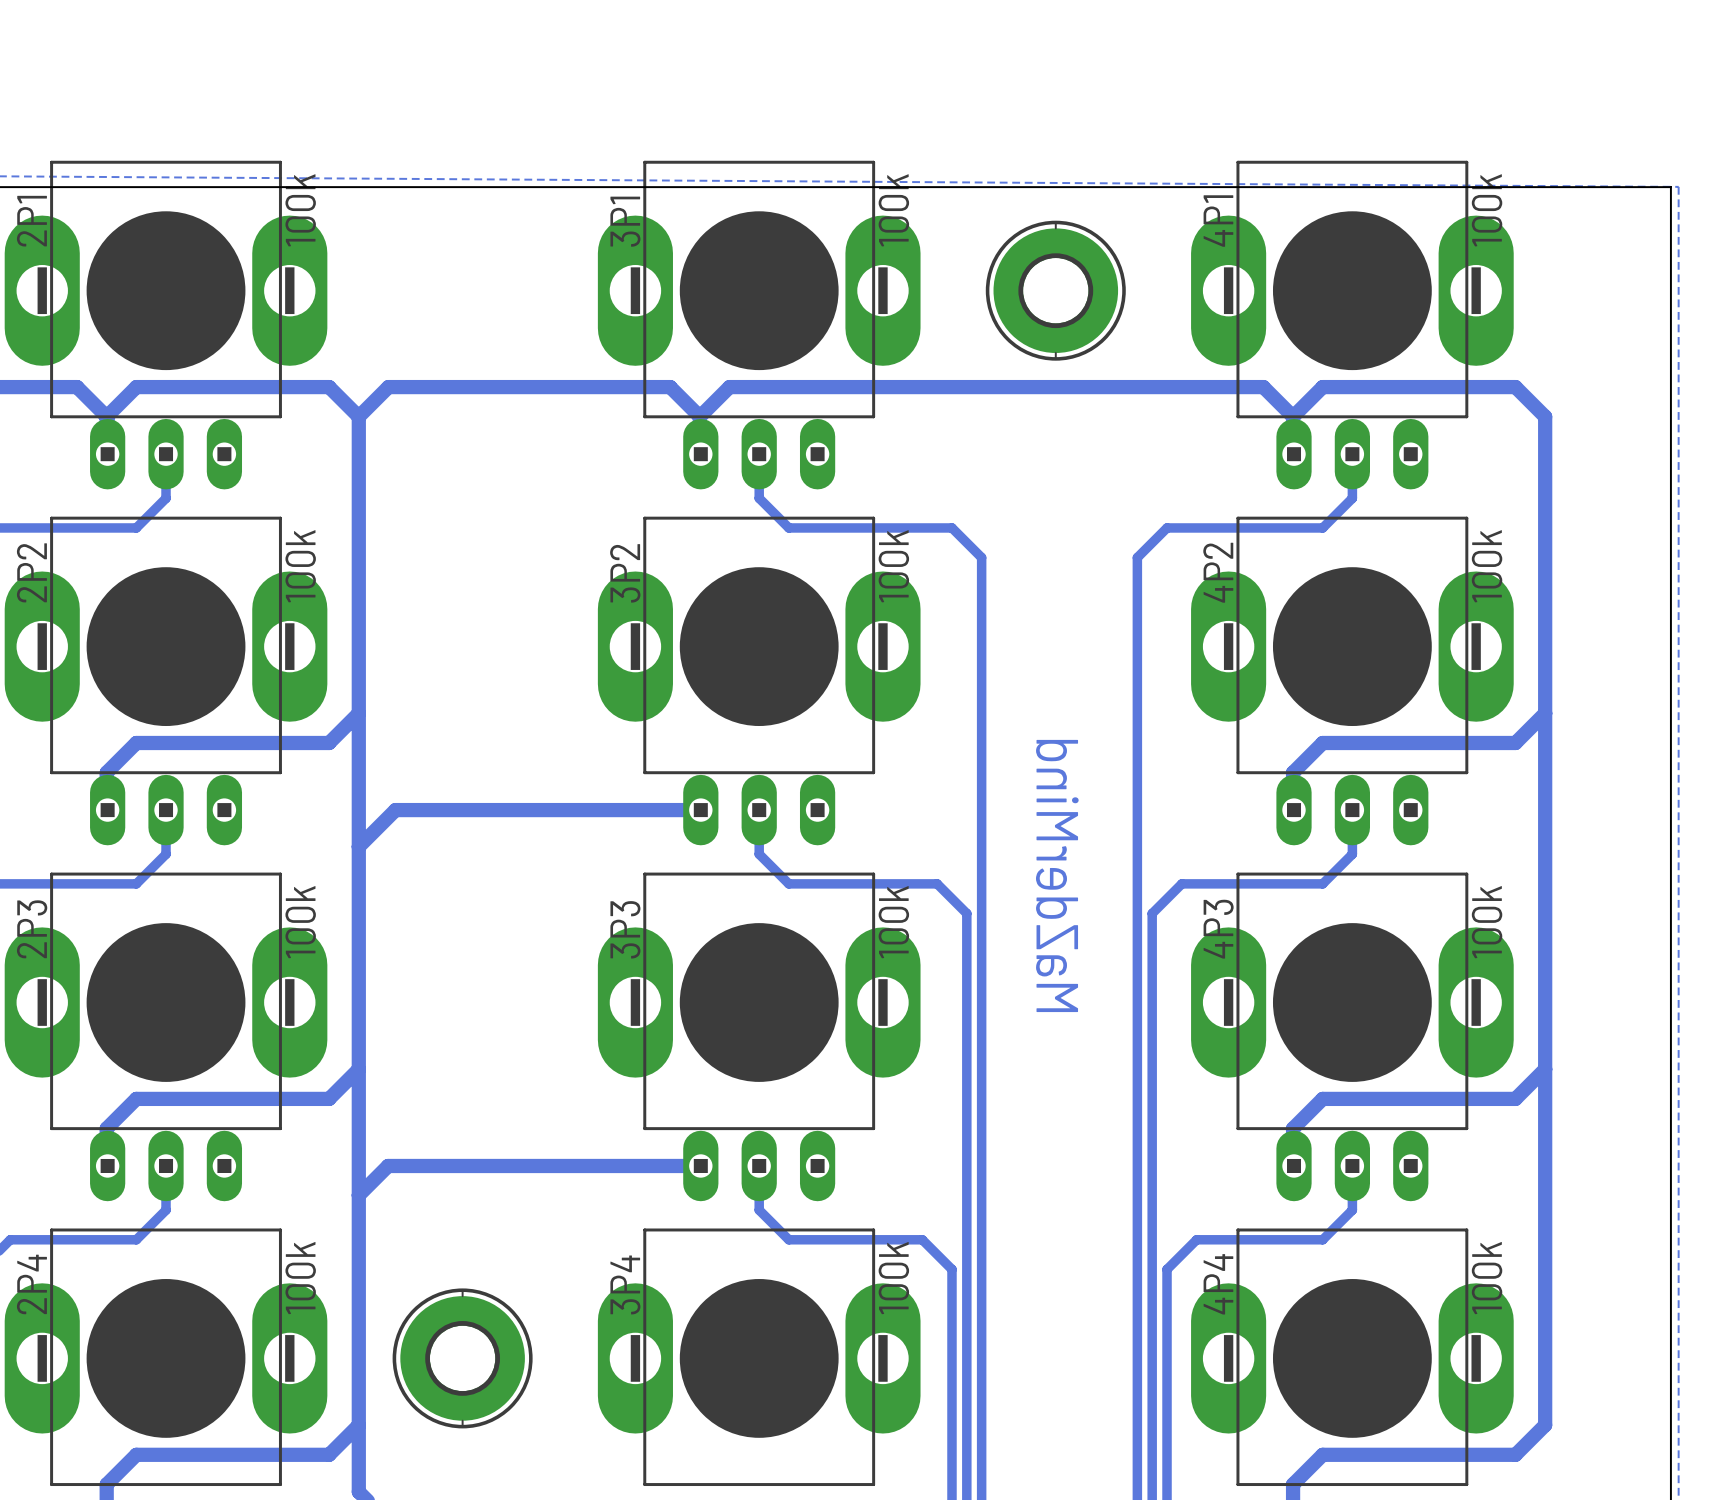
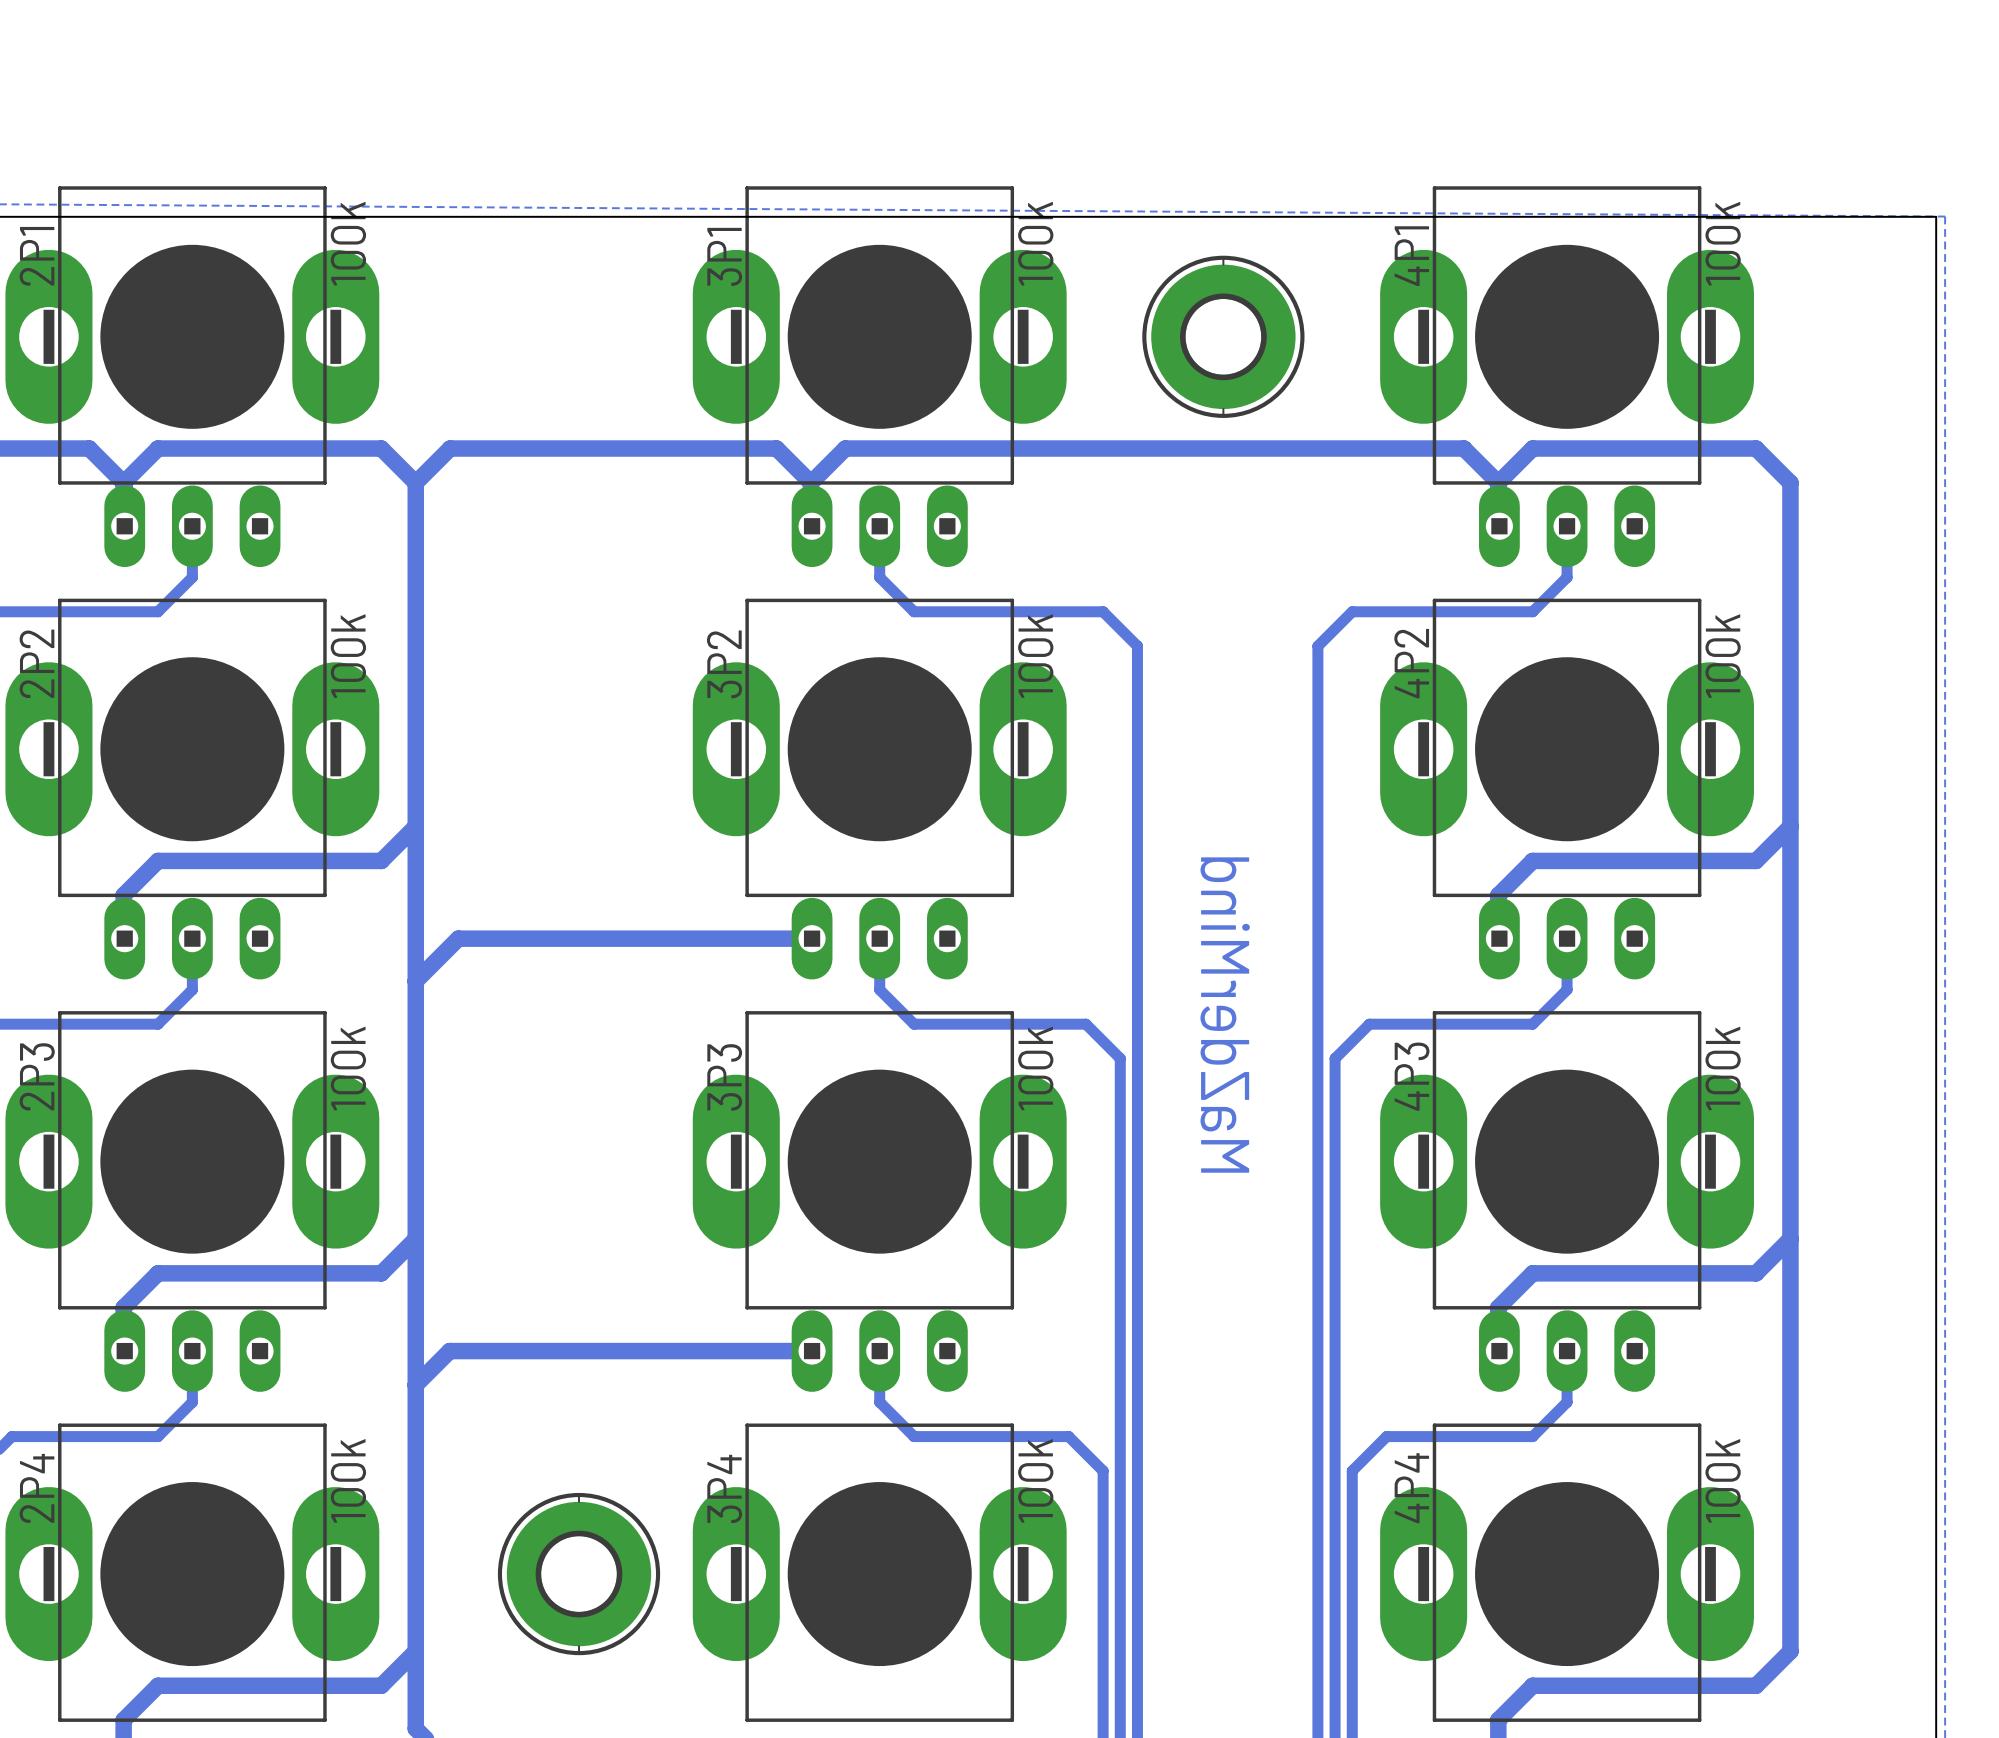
part position: (462, 1358) -> (579, 1574)

